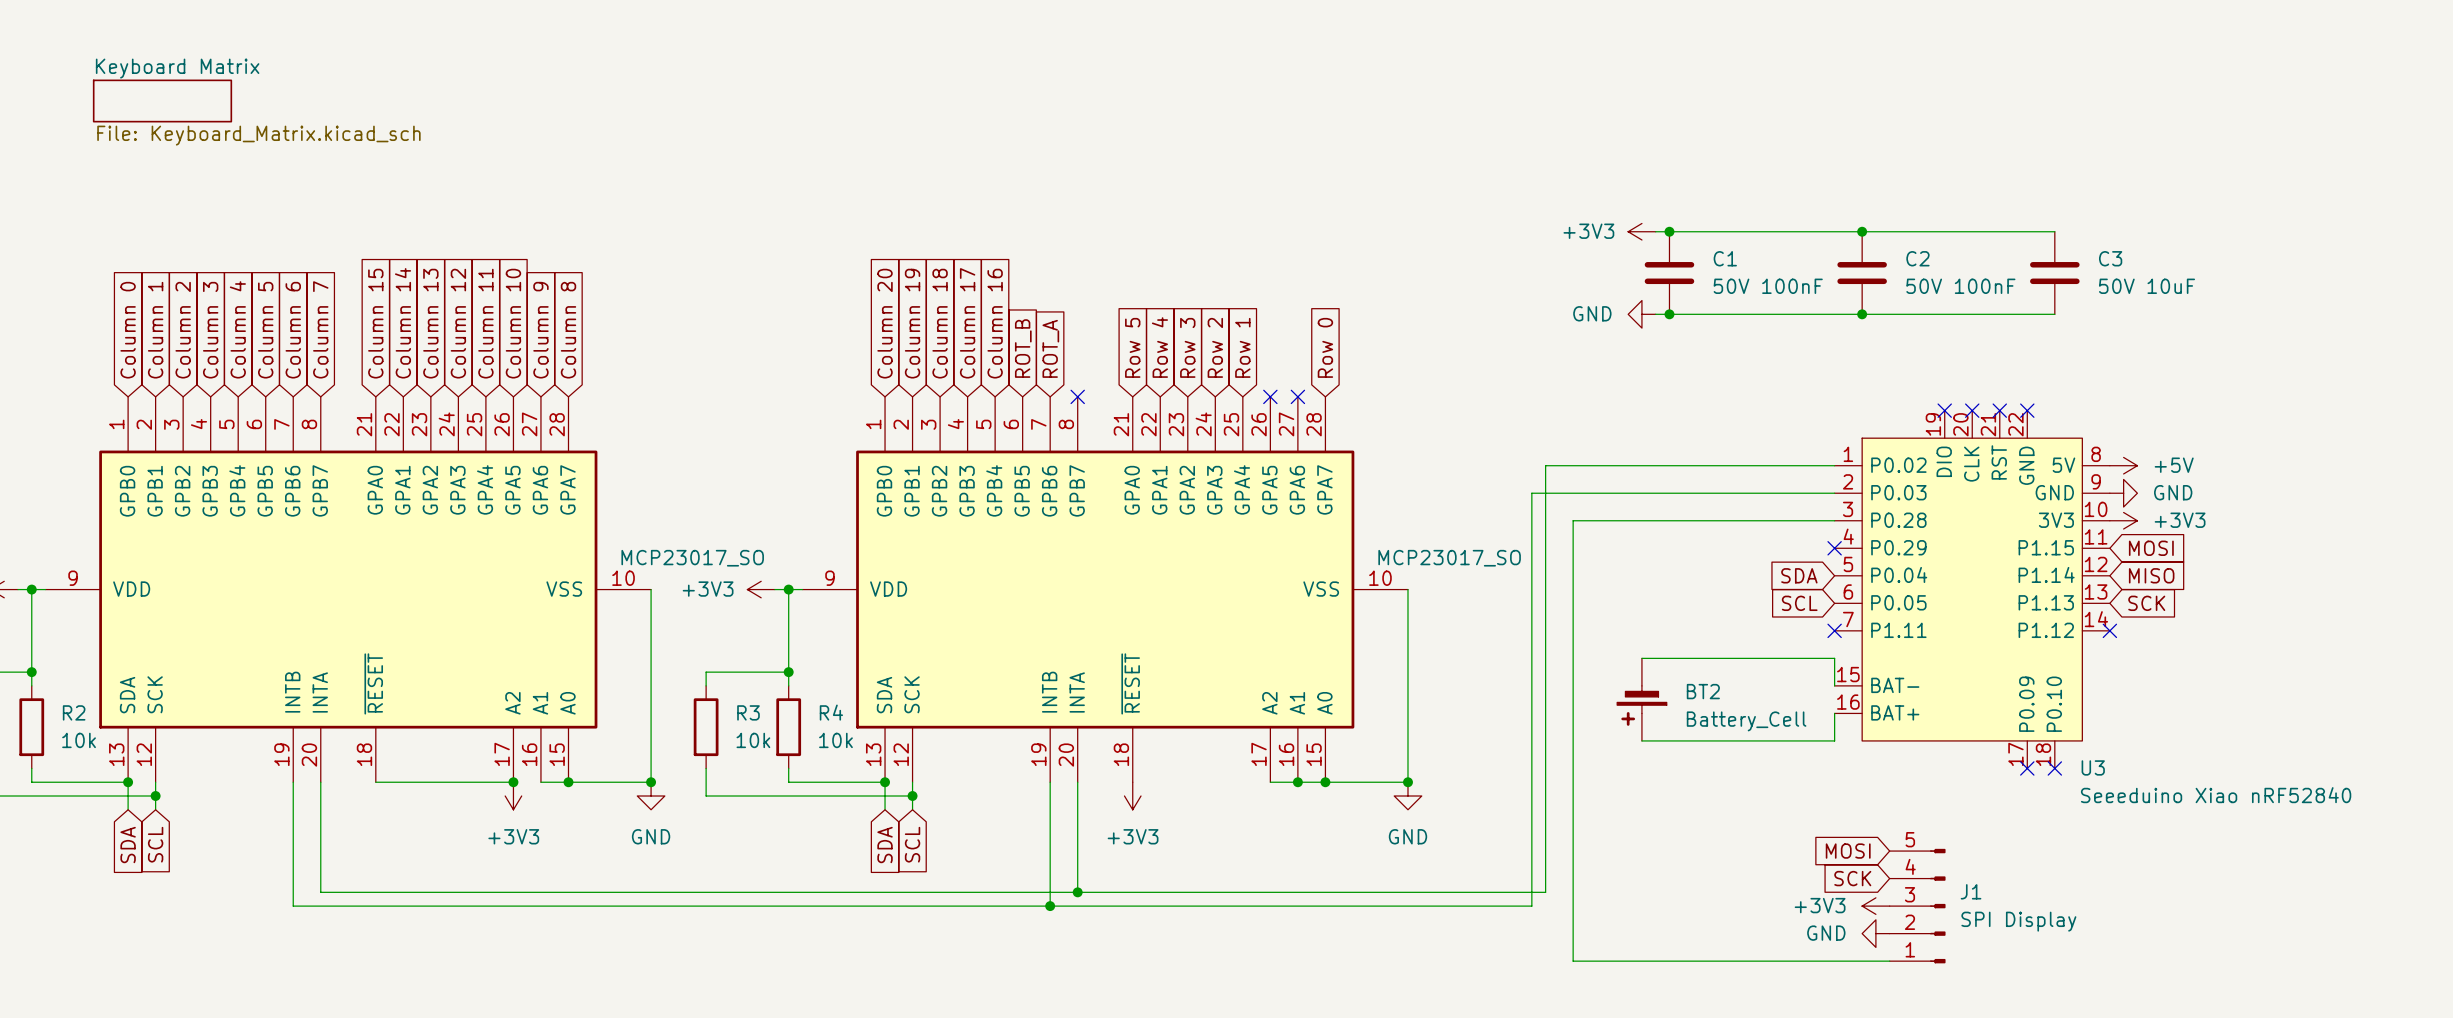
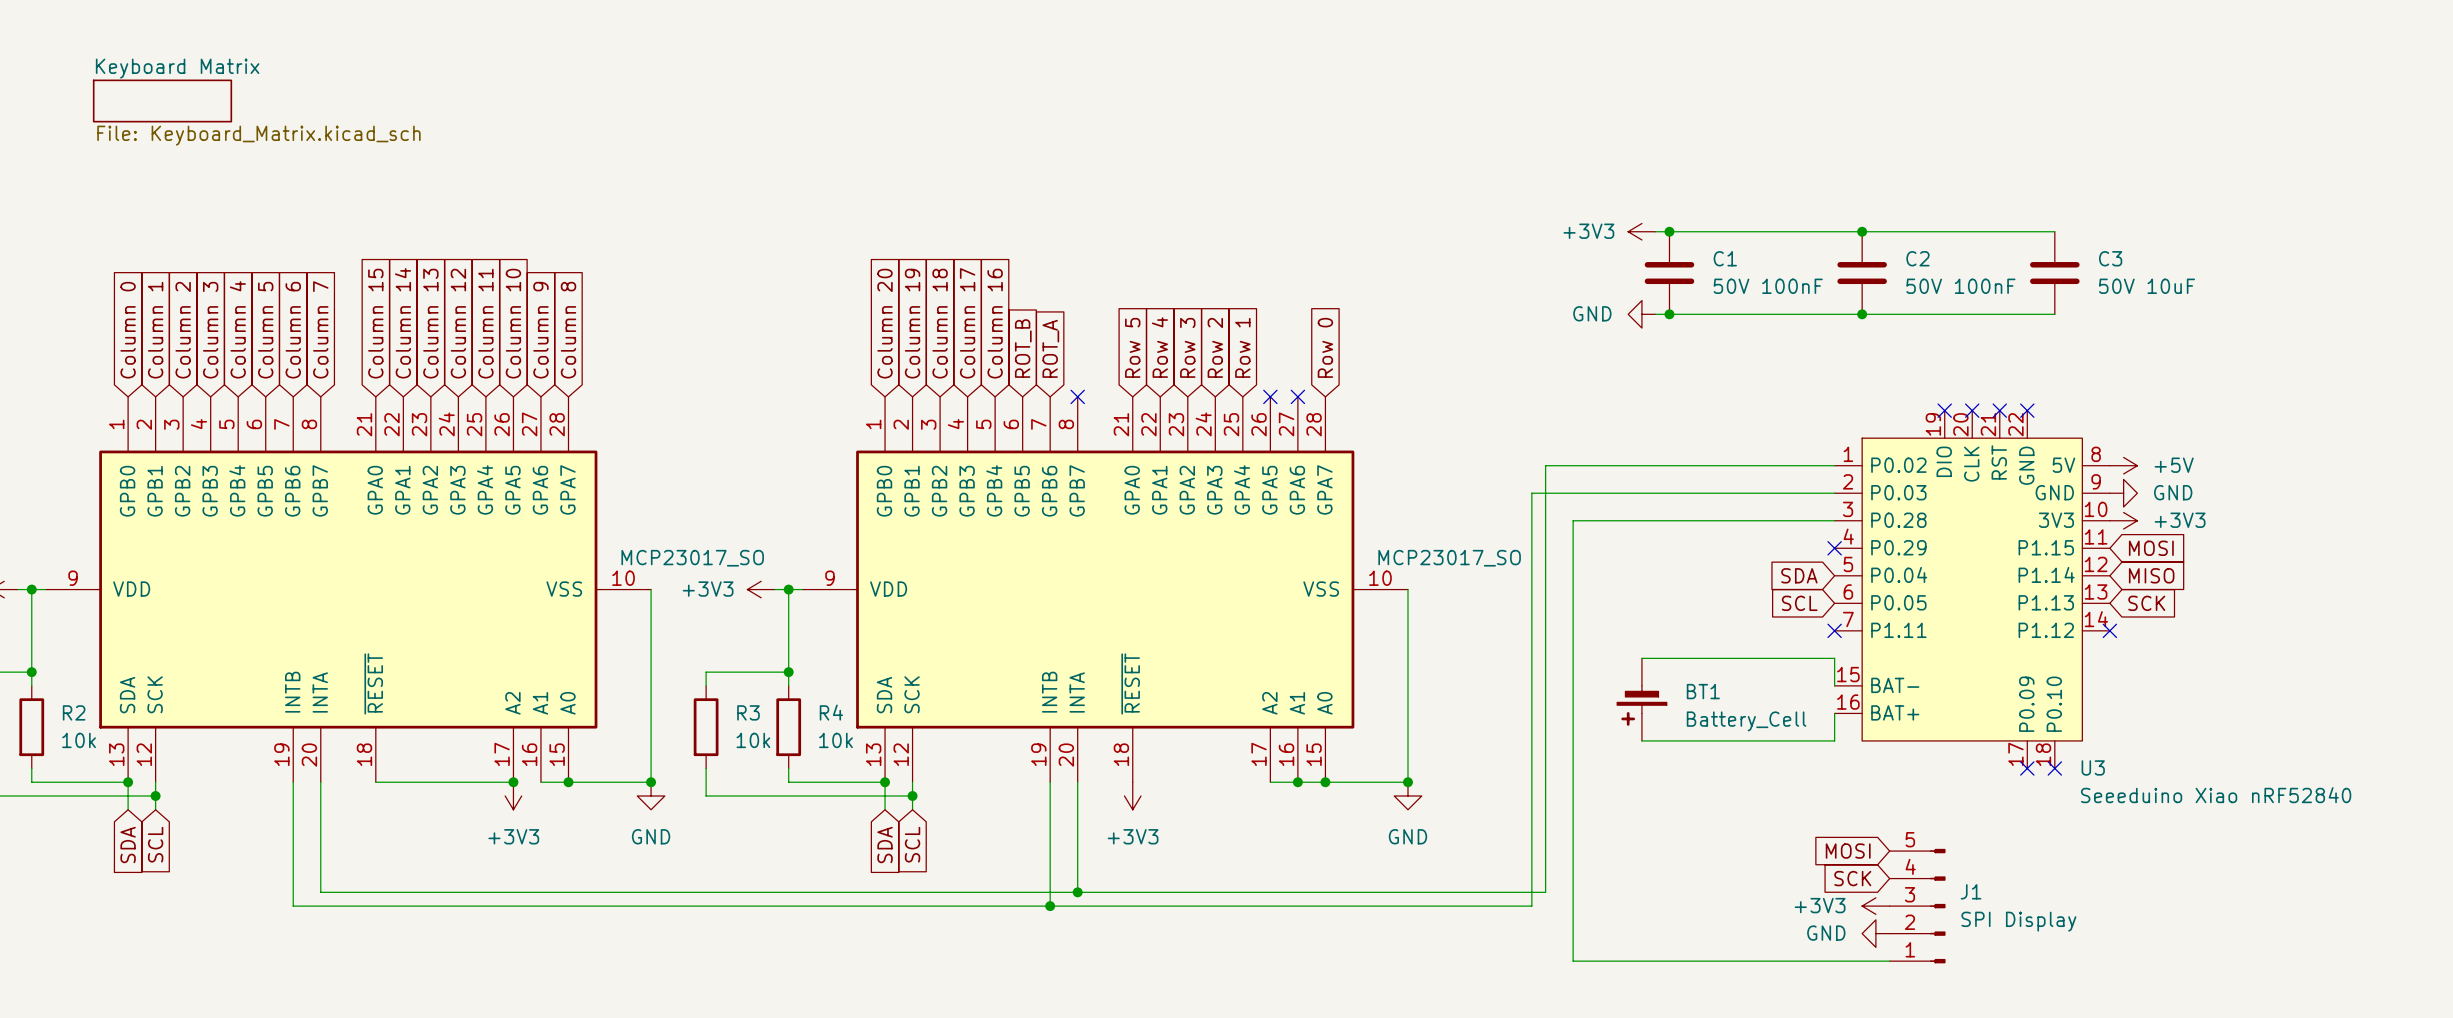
BT2 name: BT2 (1703, 691) -> BT1 (1703, 691)

